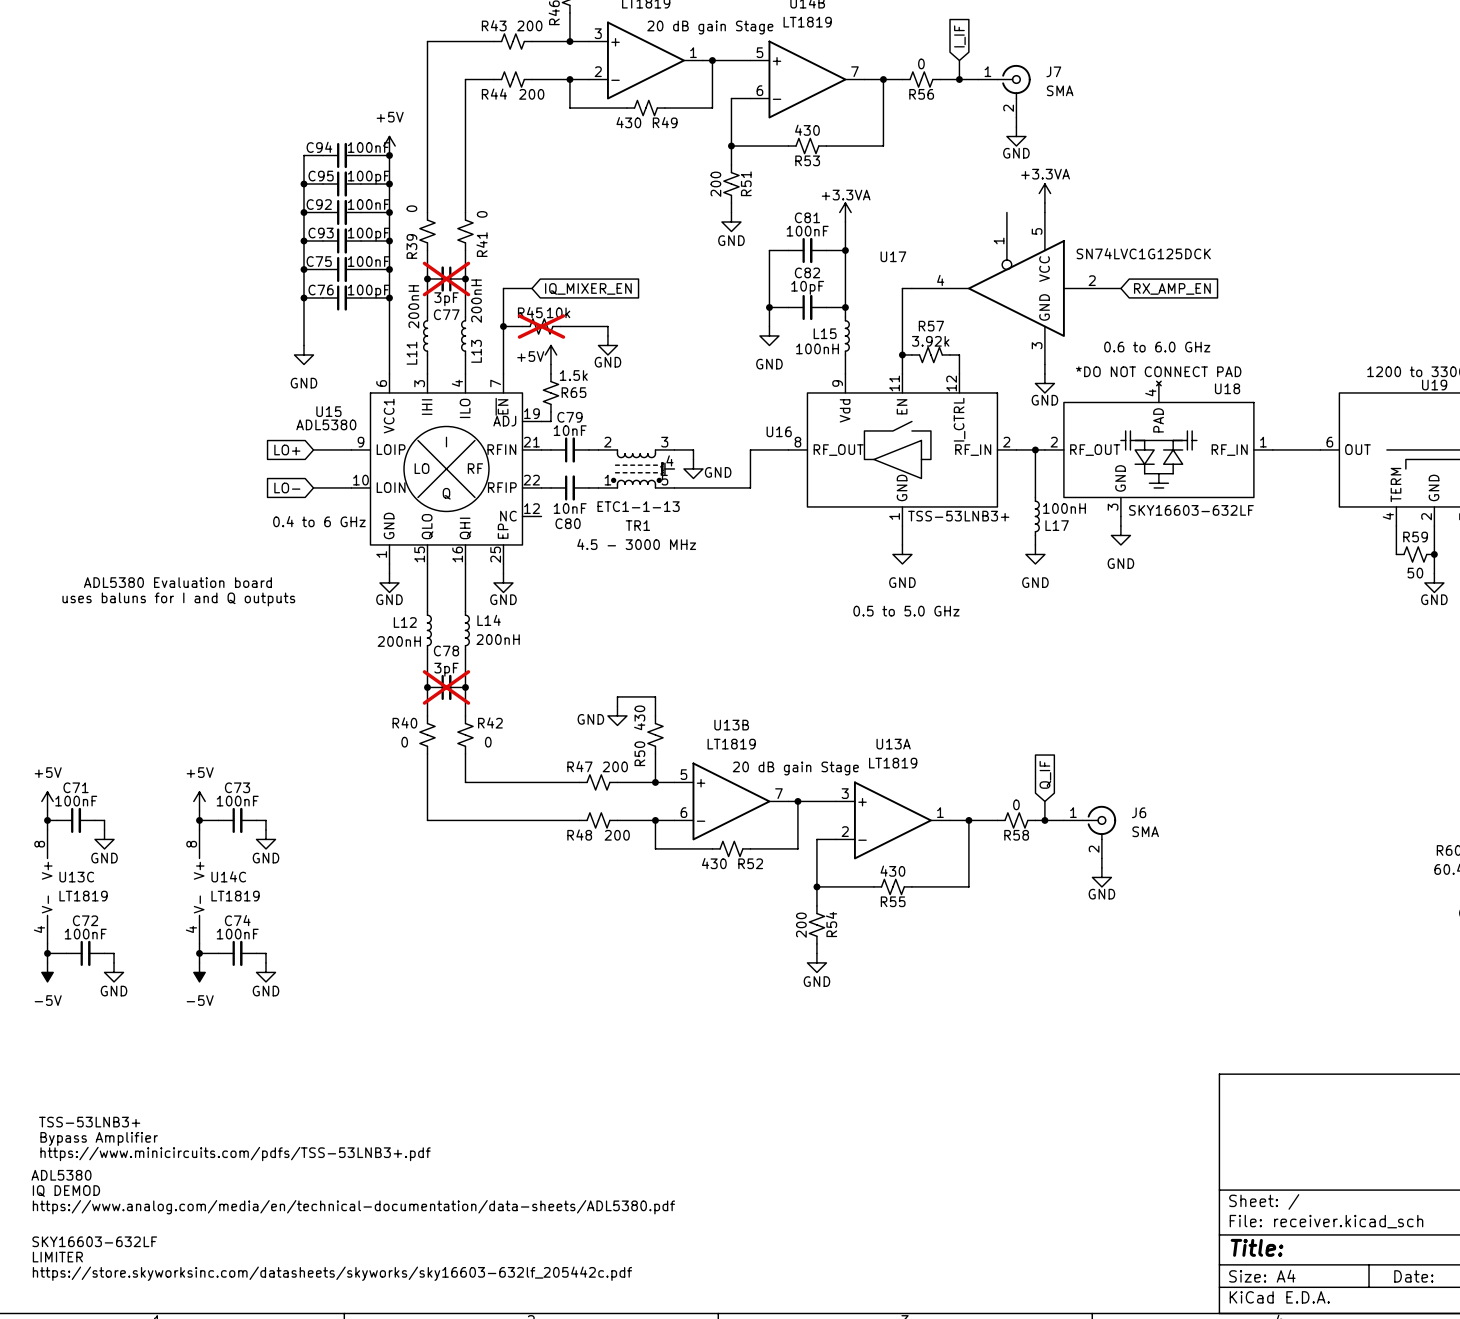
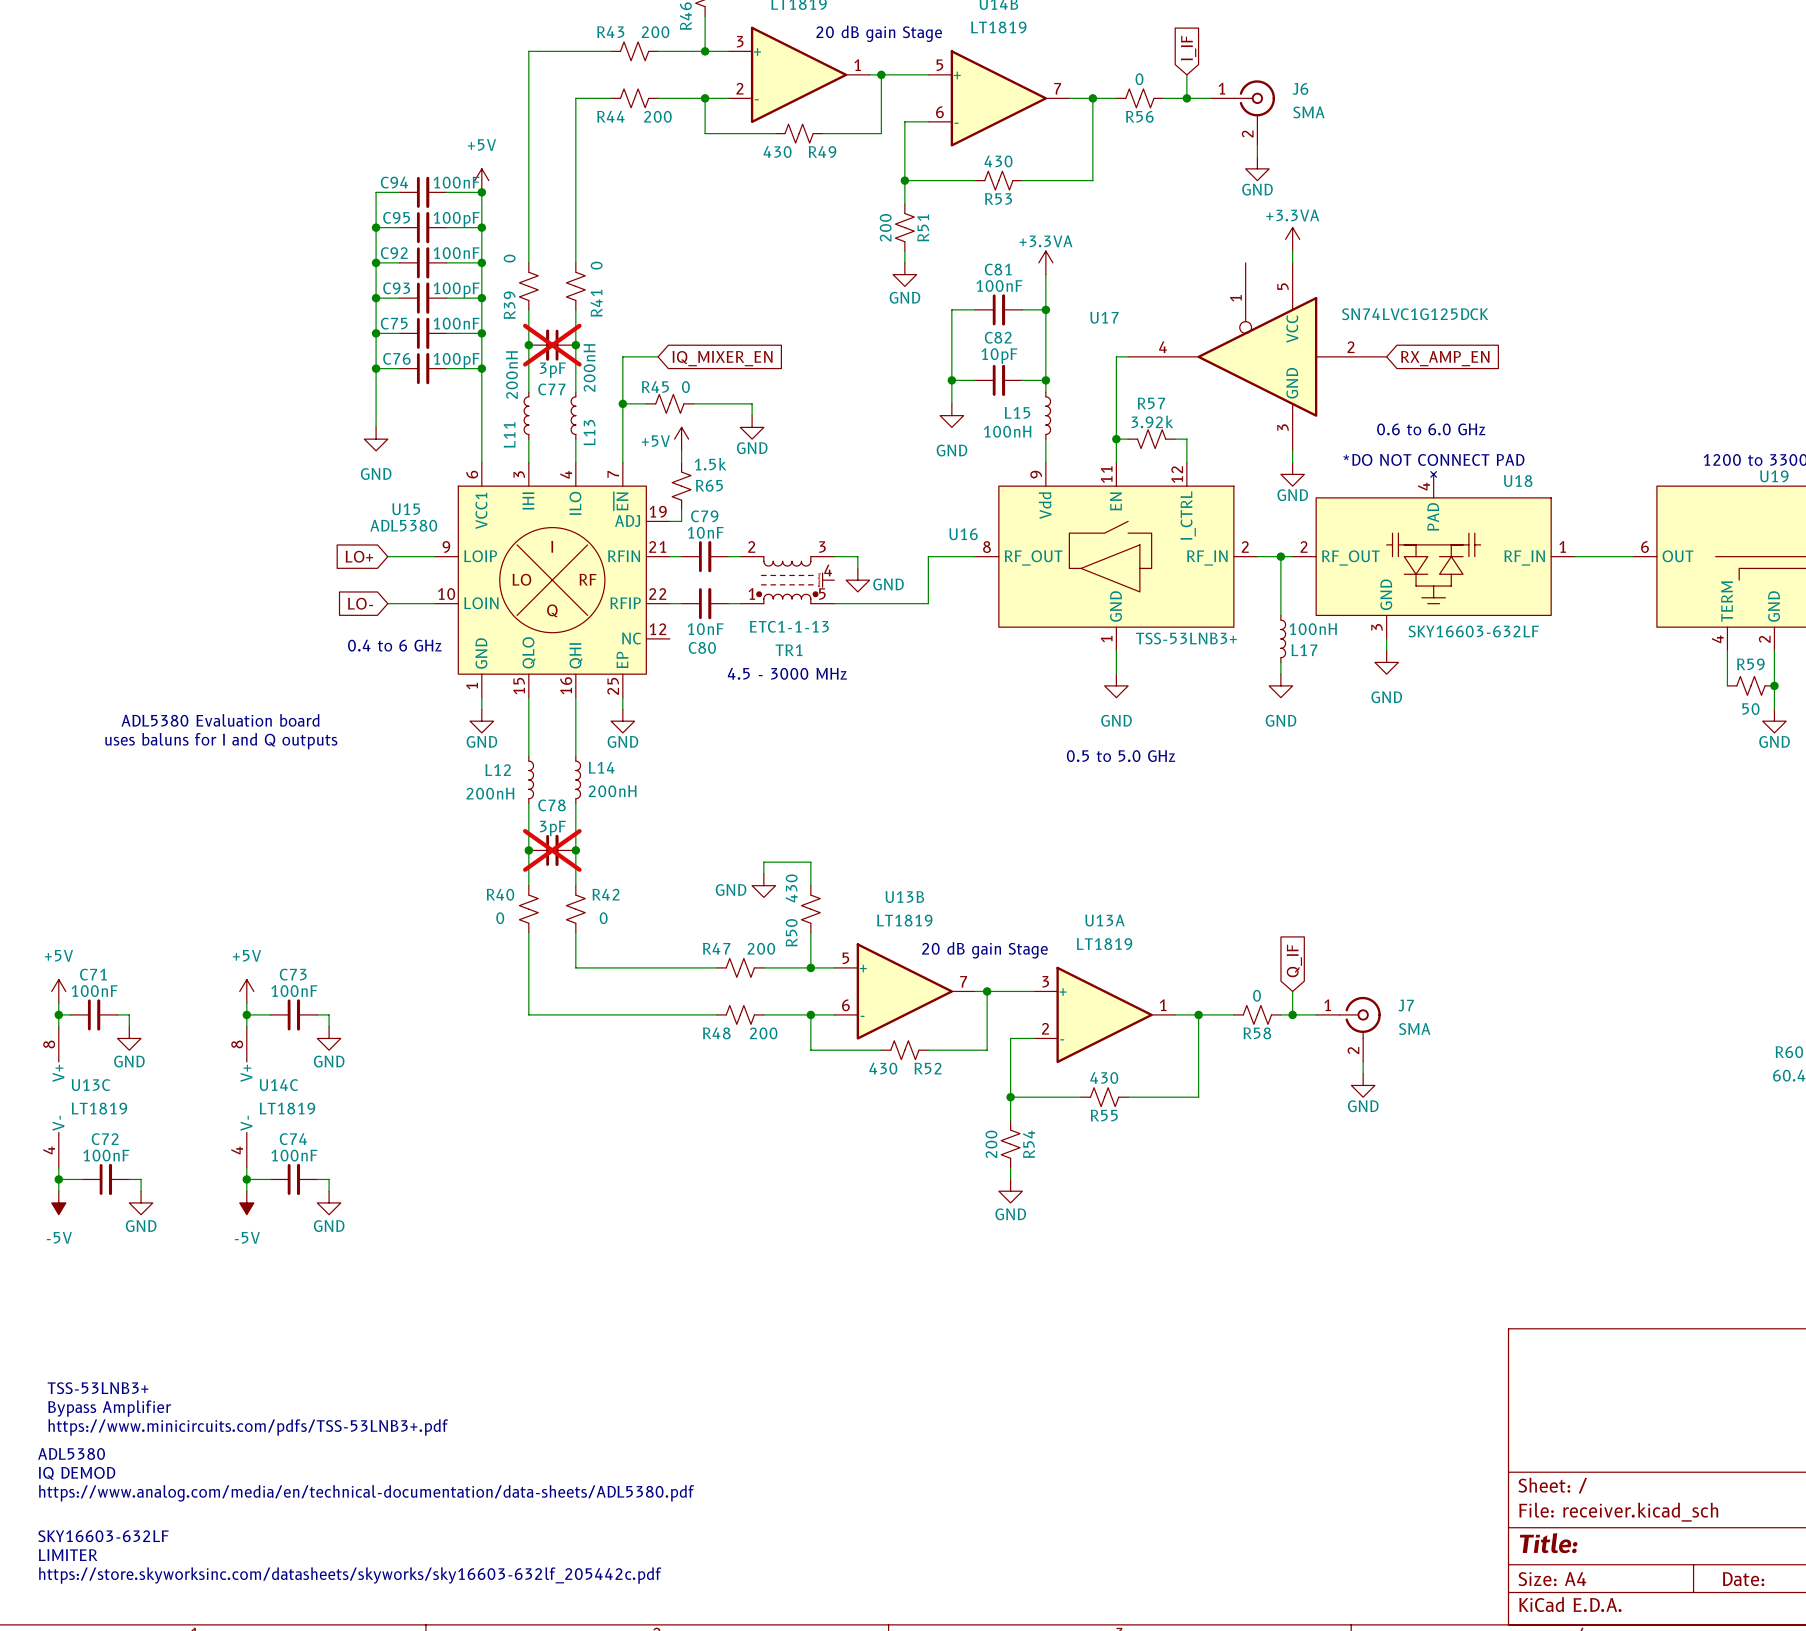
J7 name: J7 (1053, 71) -> J6 (1300, 88)
R45 value: 10k (558, 312) -> 0 (685, 387)
R45 do-not-place cross: (541, 326) -> none
J6 name: J6 (1139, 812) -> J7 (1406, 1005)

